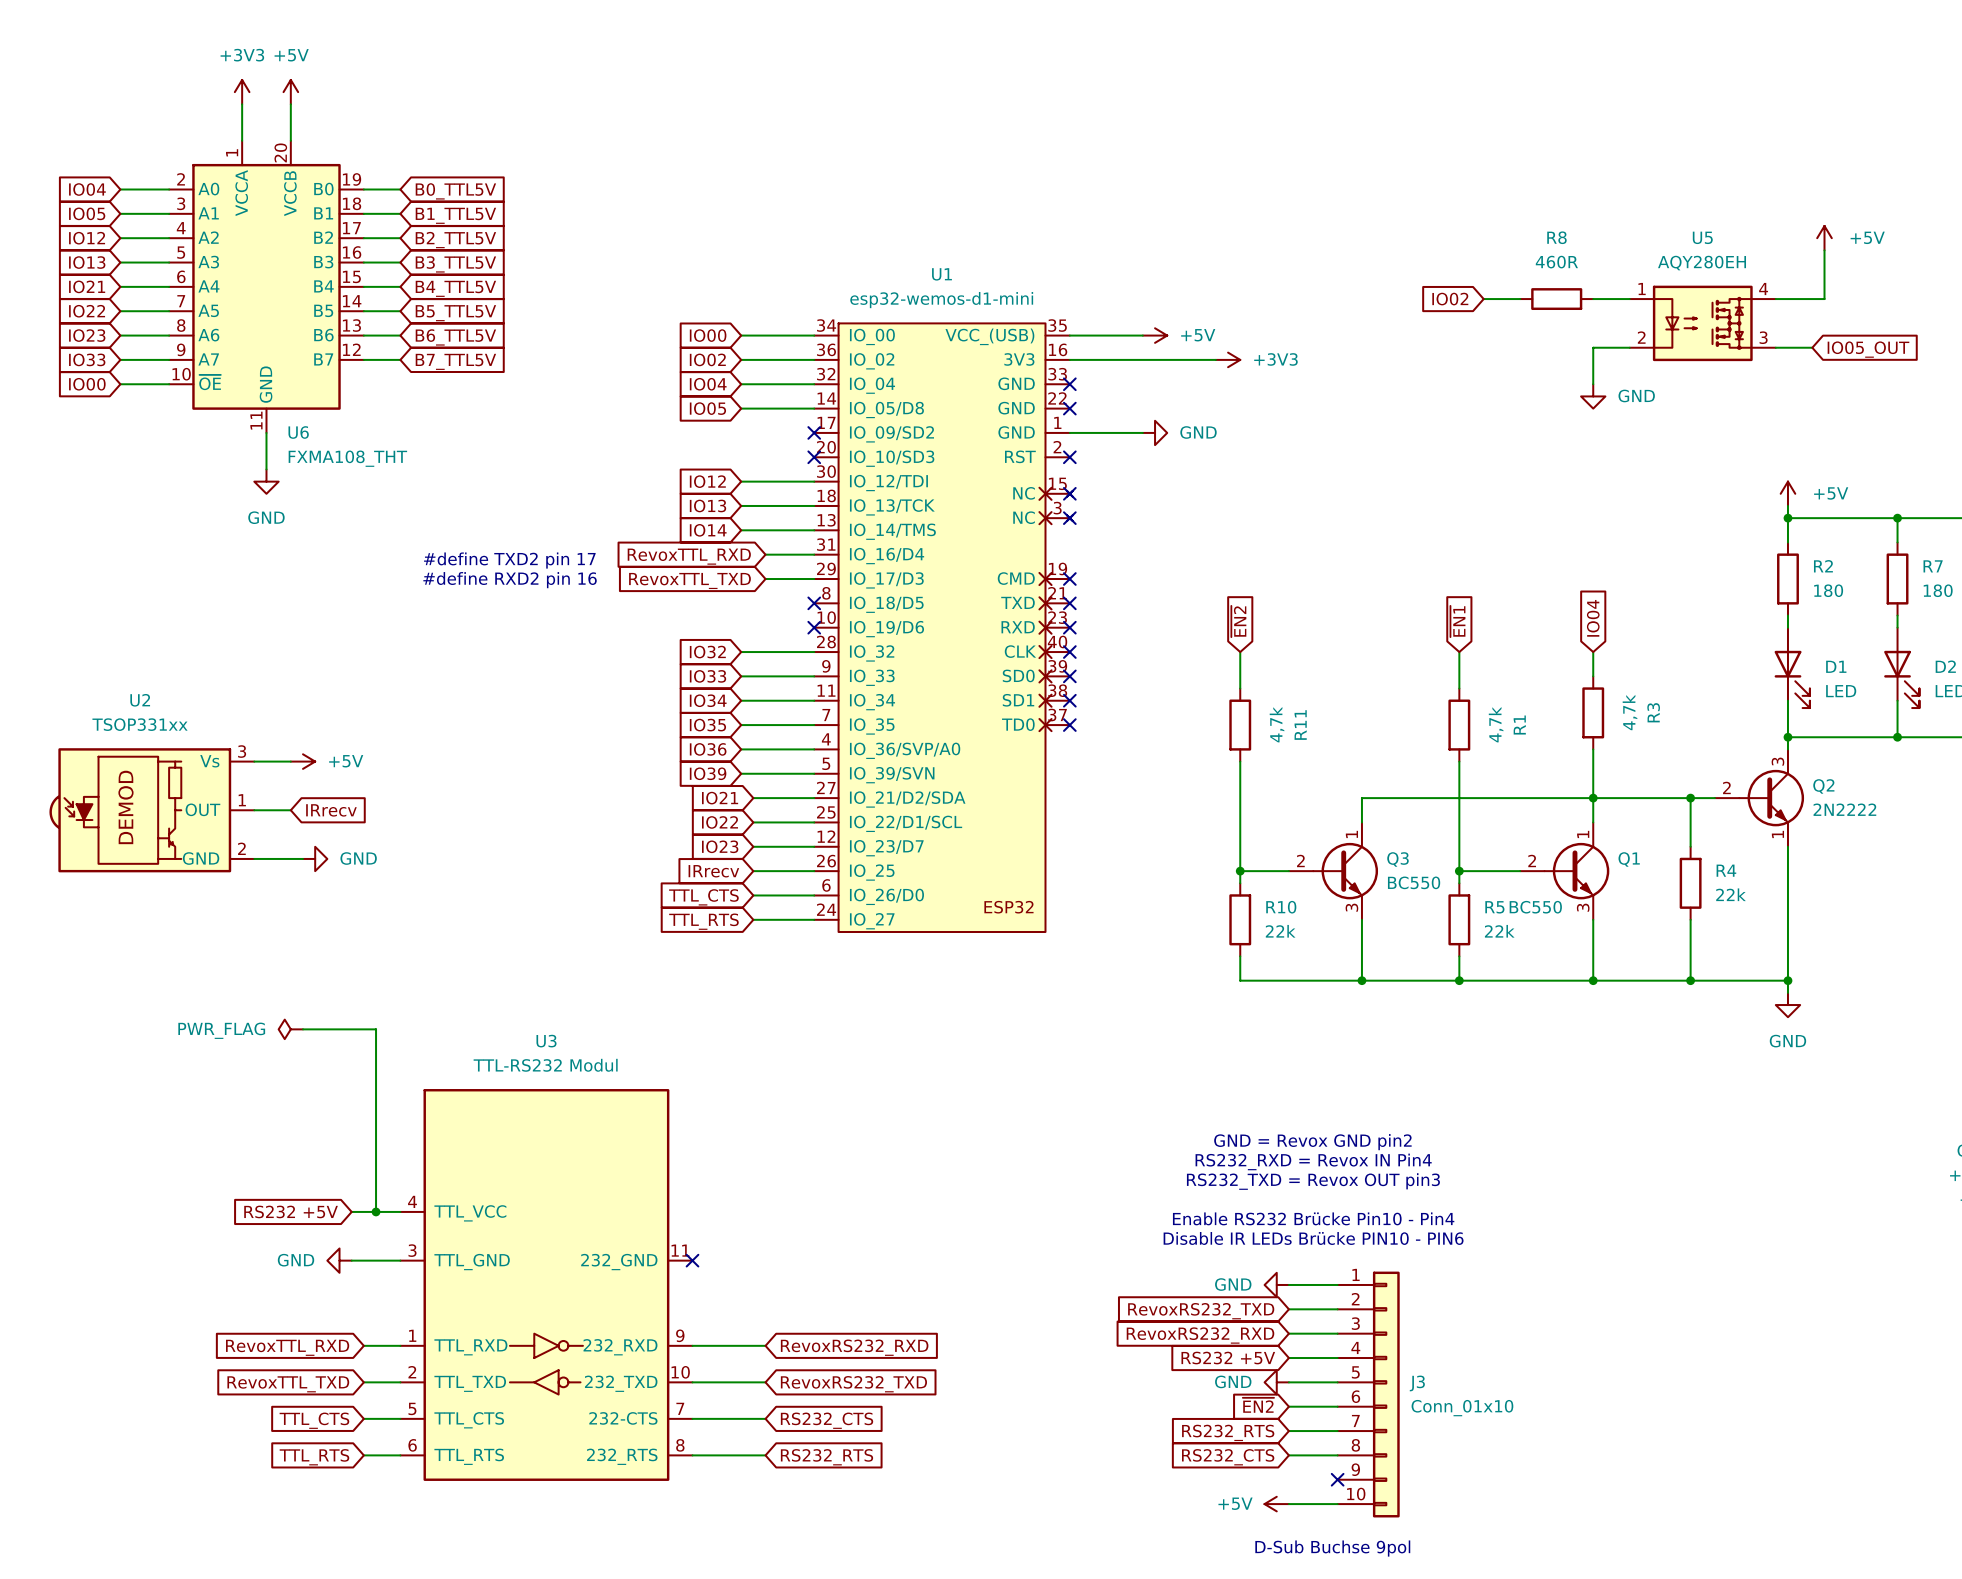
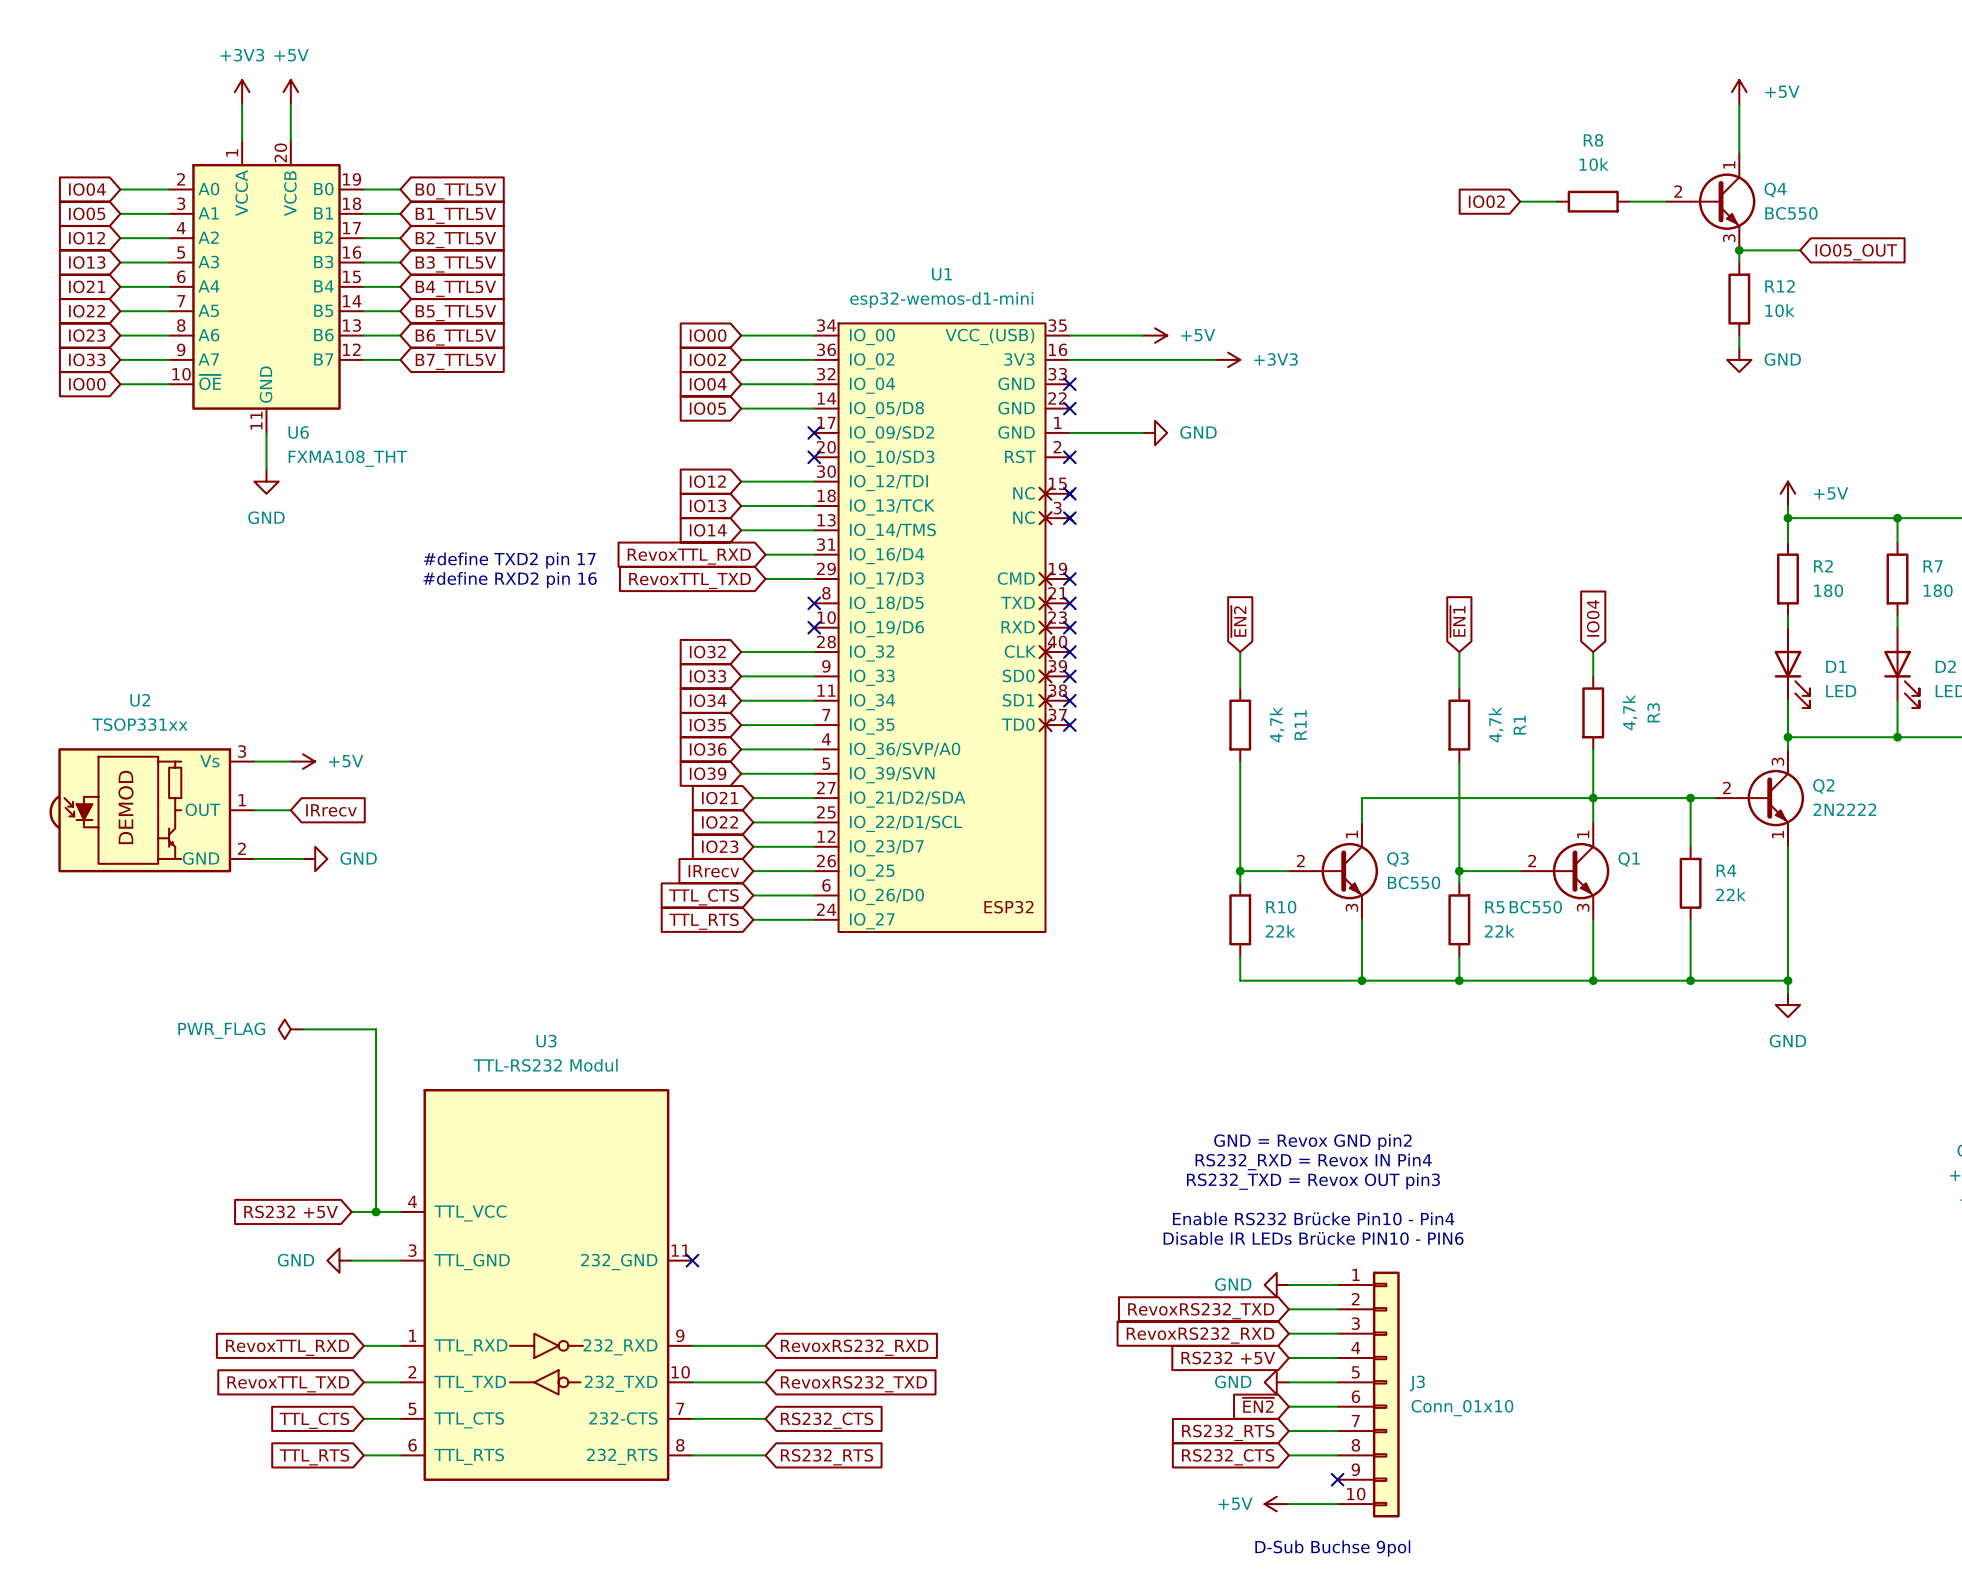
wire: none -> (1739, 104) (1739, 152)
Q4: none -> BC550 (1710, 201)
power symbol position: +5V (1824, 238) -> +5V (1739, 92)
junction: none -> (1739, 250)
wire: none -> (1800, 250) (1739, 250) (1739, 262)
wire: (1824, 250) (1824, 299) (1775, 299) -> none
R8 value: 460R (1556, 262) -> 10k (1594, 164)
global label position: IO02 (1450, 299) -> IO02 (1486, 201)
wire: (1483, 299) (1520, 299) -> (1520, 201) (1556, 201)
R8 position: (1556, 299) -> (1593, 201)
wire: (1593, 299) (1629, 299) -> (1629, 201) (1666, 201)
R12: none -> 10k (1739, 299)
U5: AQY280EH (1702, 323) -> none
wire: (1629, 347) (1593, 347) (1593, 384) -> none
wire: (1775, 347) (1812, 347) -> none
global label position: IO05_OUT (1868, 349) -> IO05_OUT (1856, 252)
power symbol position: GND (1593, 396) -> GND (1739, 359)

